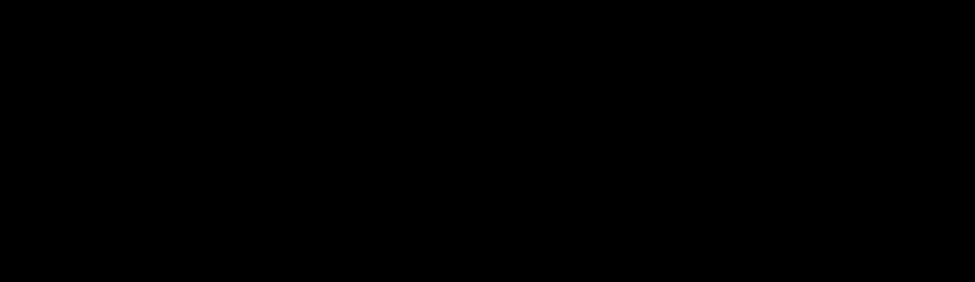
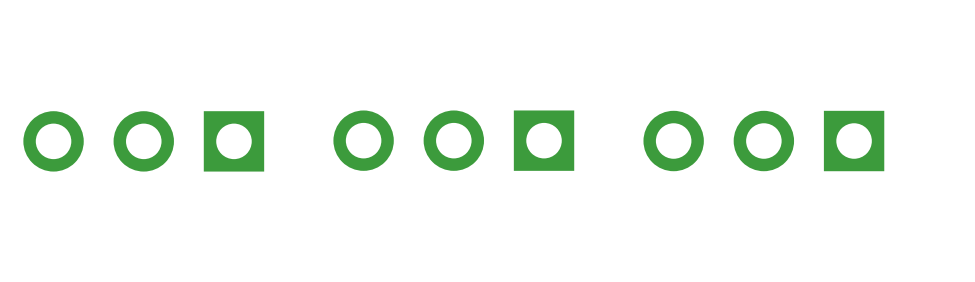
part: none -> (453, 140)
part: none -> (143, 141)
part: none -> (763, 141)

